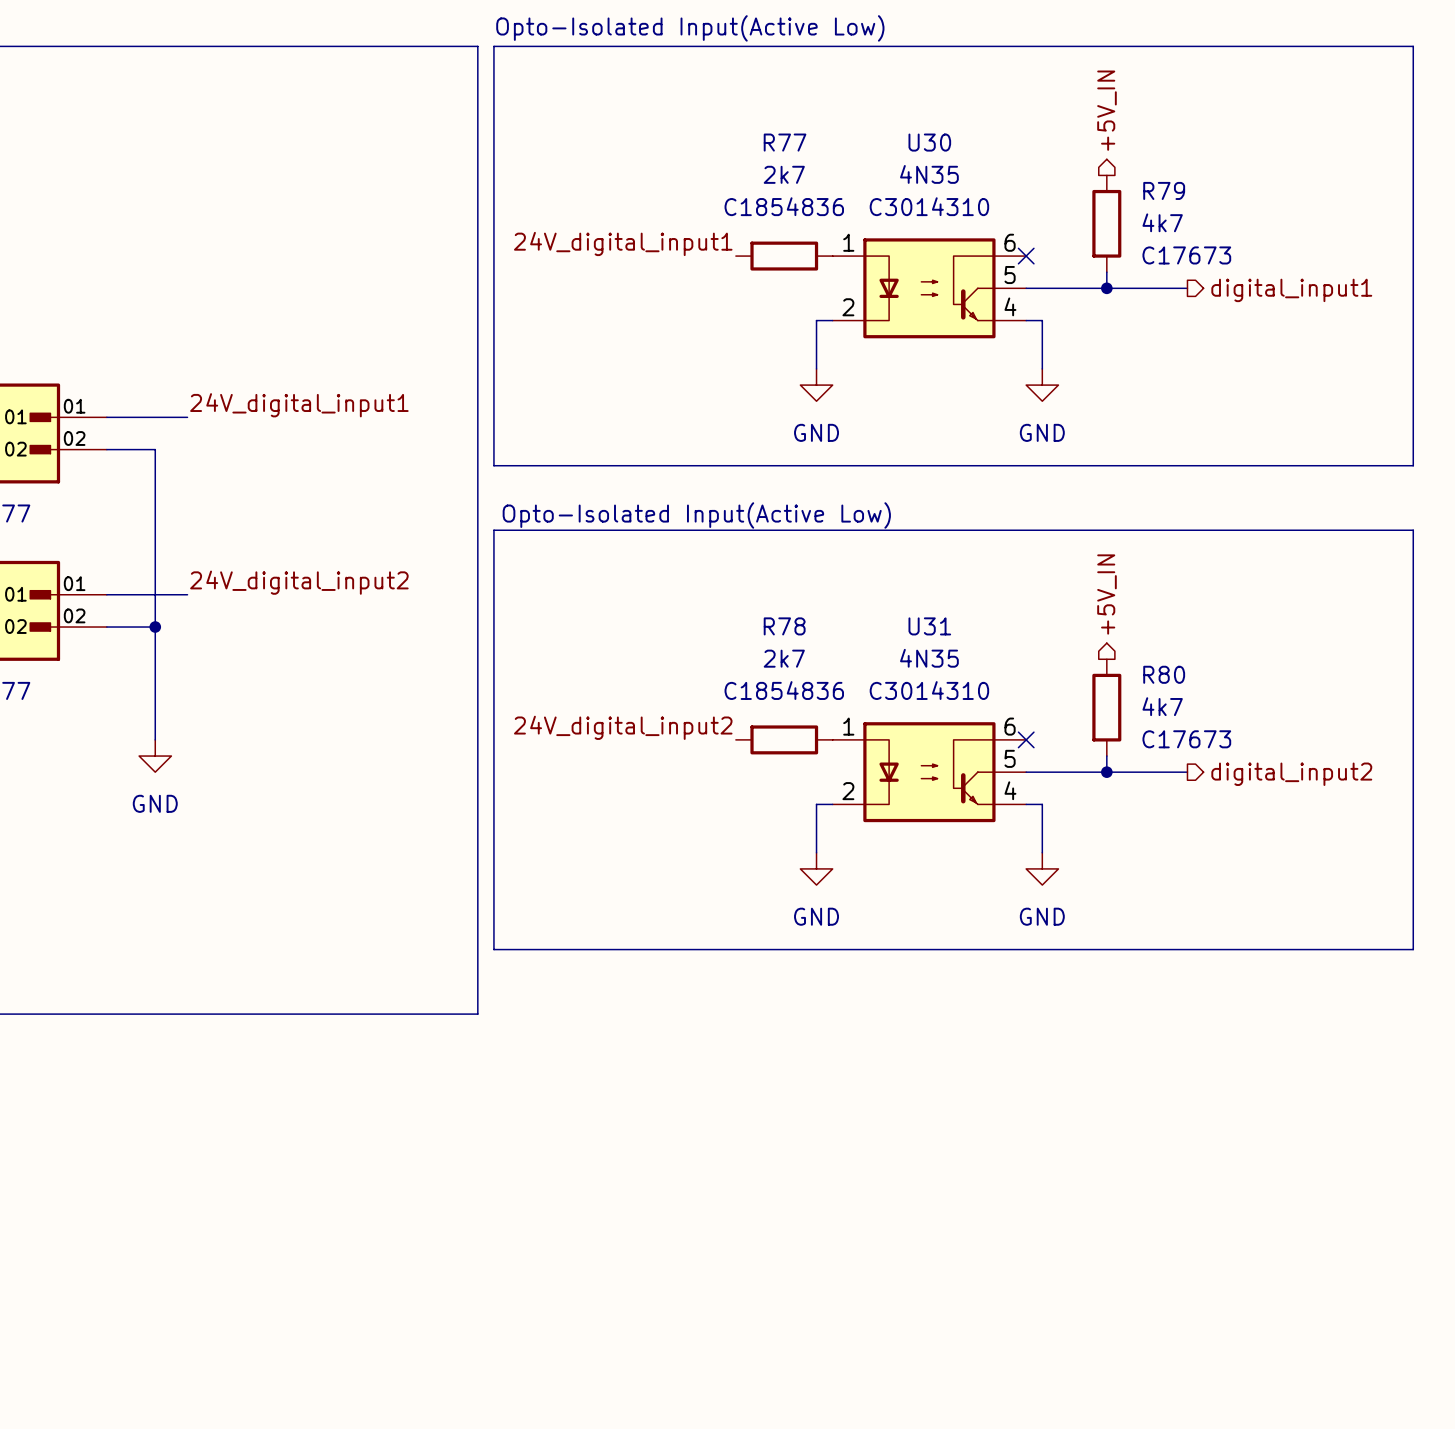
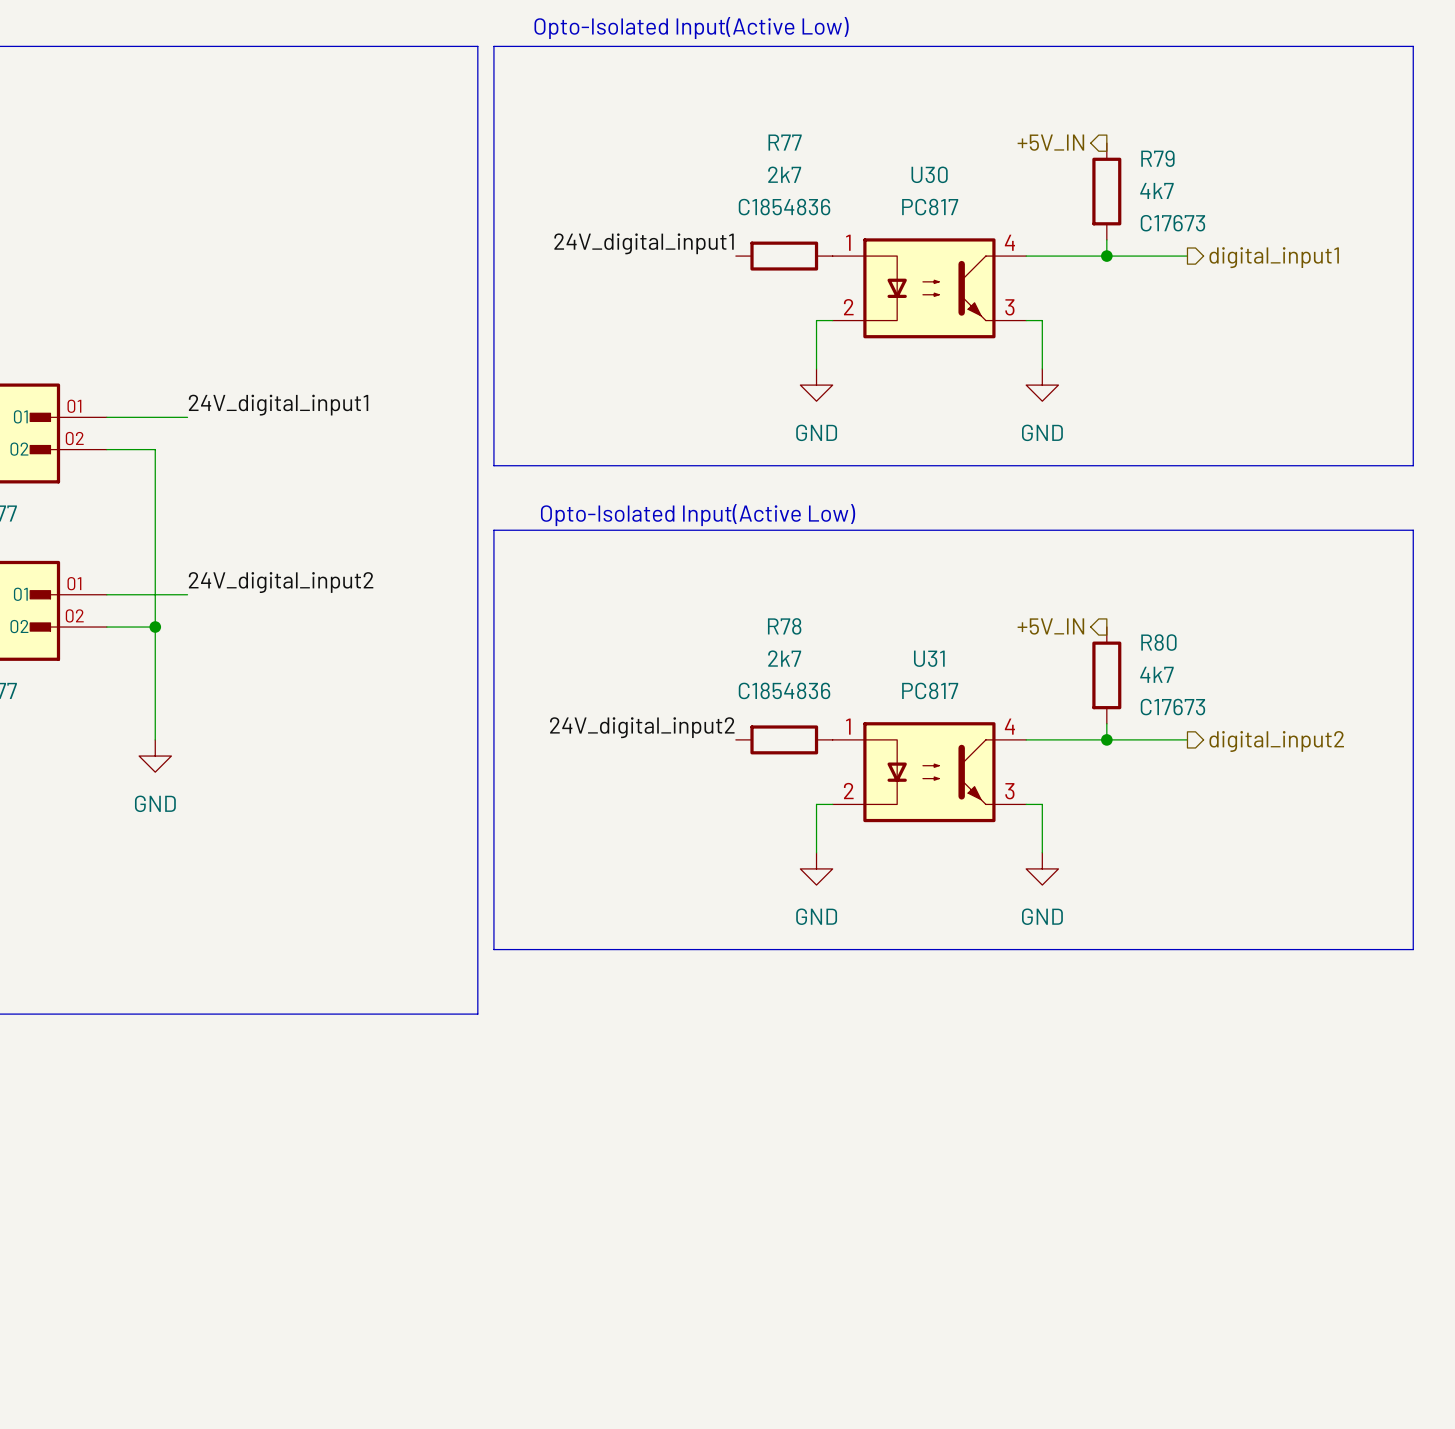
hierarchical label rotation: 0° (1106, 110) -> 90° counterclockwise (1050, 142)
U30 name position: U30 (929, 142) -> U30 (929, 174)
U30 value: 4N35 (929, 174) -> PC817 (930, 207)
U30 text: C3014310 (929, 206) -> none
R79 position: (1106, 223) -> (1106, 191)
U30 symbol: [832, 238, 1027, 339] -> [832, 238, 1027, 339]
no-connect mark: (1026, 256) -> none
wire: (1106, 272) (1106, 288) -> (1106, 239) (1106, 256)
wire: (1026, 288) (1187, 288) -> (1026, 256) (1187, 256)
junction position: (1106, 288) -> (1106, 256)
hierarchical label position: digital_input1 (1291, 290) -> digital_input1 (1274, 257)
hierarchical label rotation: 0° (1106, 594) -> 90° counterclockwise (1050, 626)
U31 name position: U31 (929, 626) -> U31 (929, 658)
U31 value: 4N35 (929, 658) -> PC817 (930, 690)
U31 text: C3014310 (929, 690) -> none
R80 position: (1106, 707) -> (1106, 675)
U31 symbol: [832, 722, 1027, 823] -> [832, 722, 1027, 823]
no-connect mark: (1026, 739) -> none
wire: (1106, 756) (1106, 772) -> (1106, 723) (1106, 739)
wire: (1026, 772) (1187, 772) -> (1026, 739) (1187, 739)
junction position: (1106, 772) -> (1106, 739)
hierarchical label position: digital_input2 (1291, 774) -> digital_input2 (1276, 741)

